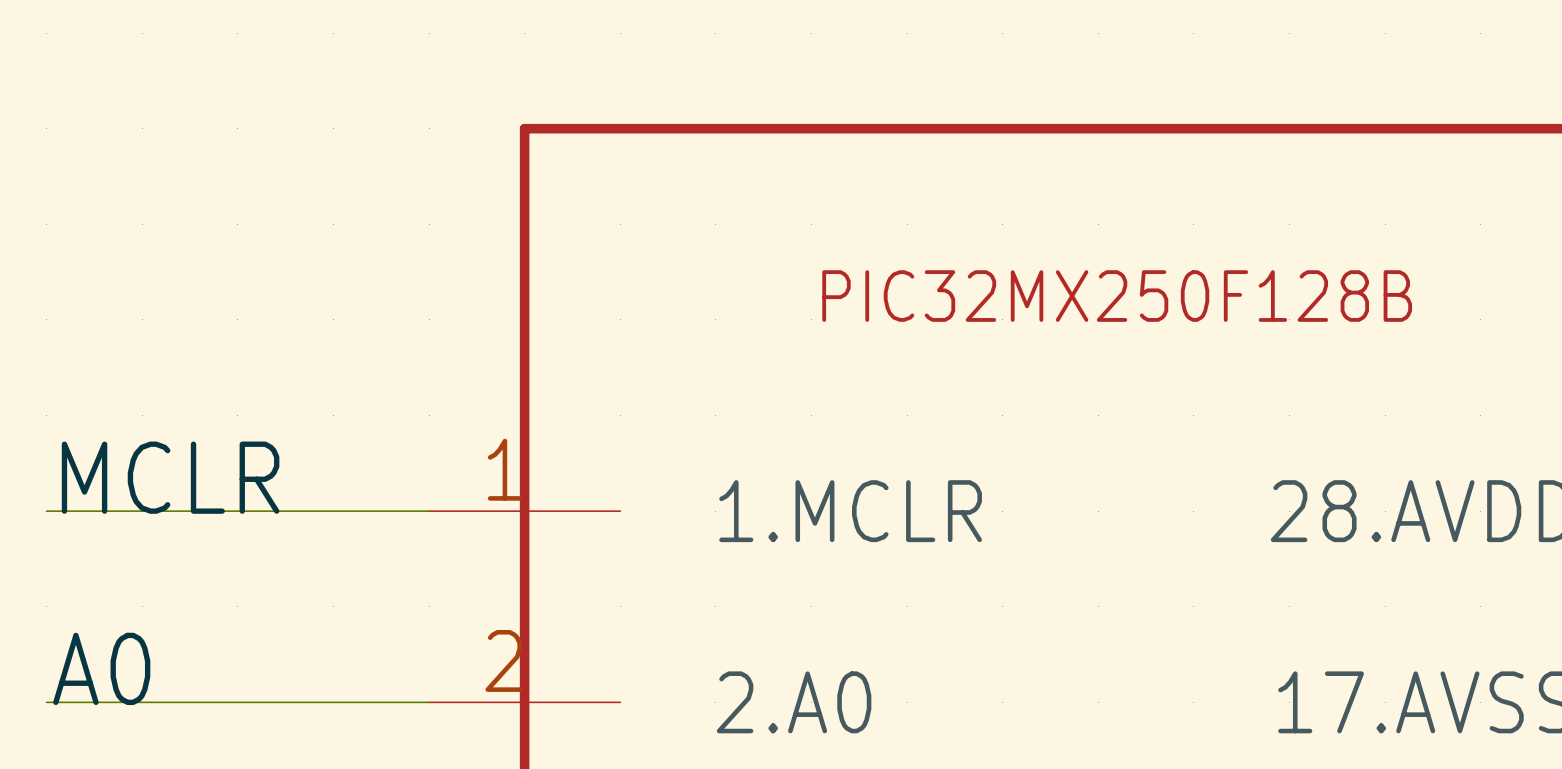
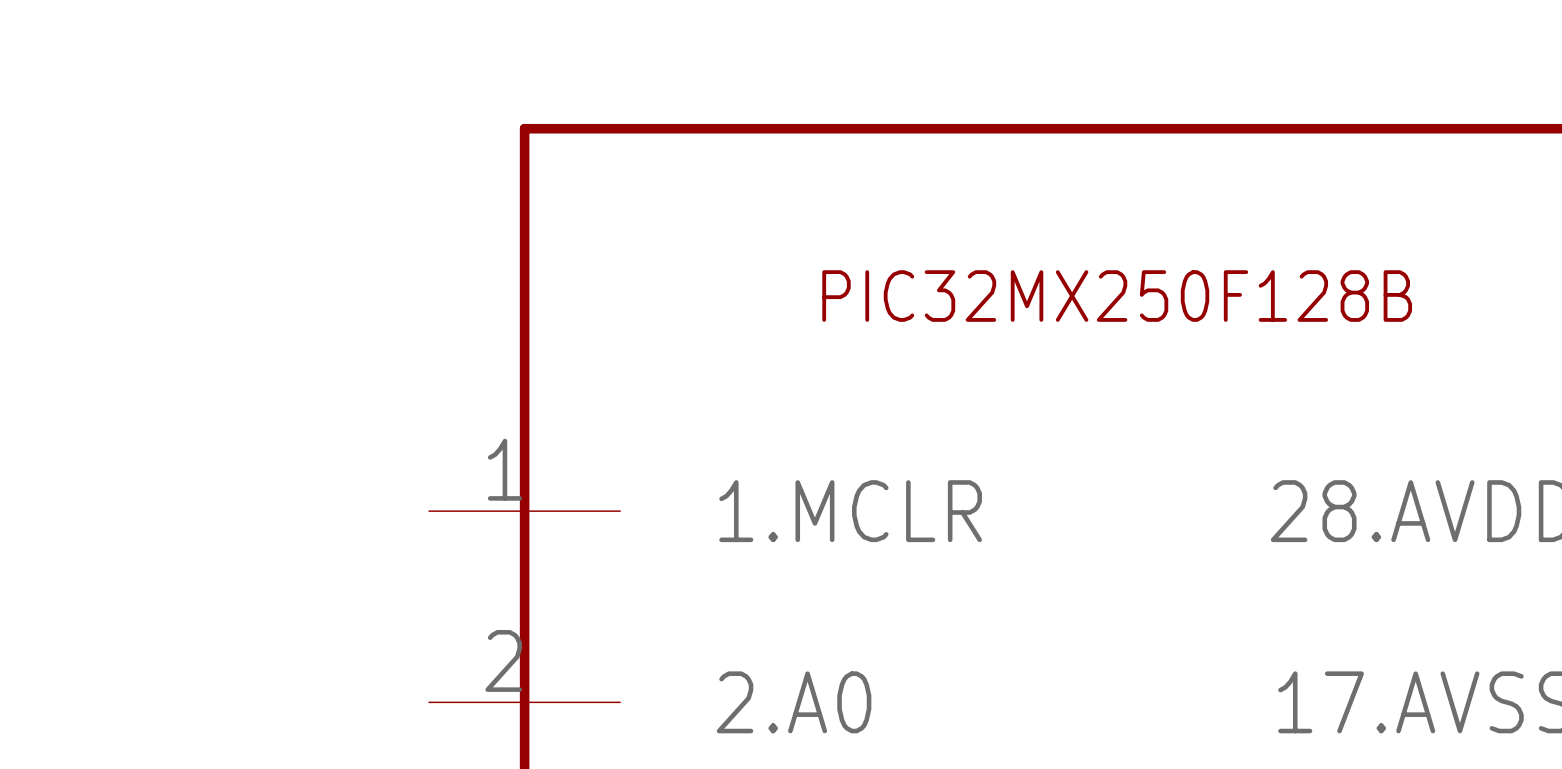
label: MCLR (170, 477) -> none
wire: (46, 511) (429, 511) -> none
label: A0 (101, 668) -> none
wire: (46, 702) (429, 702) -> none

